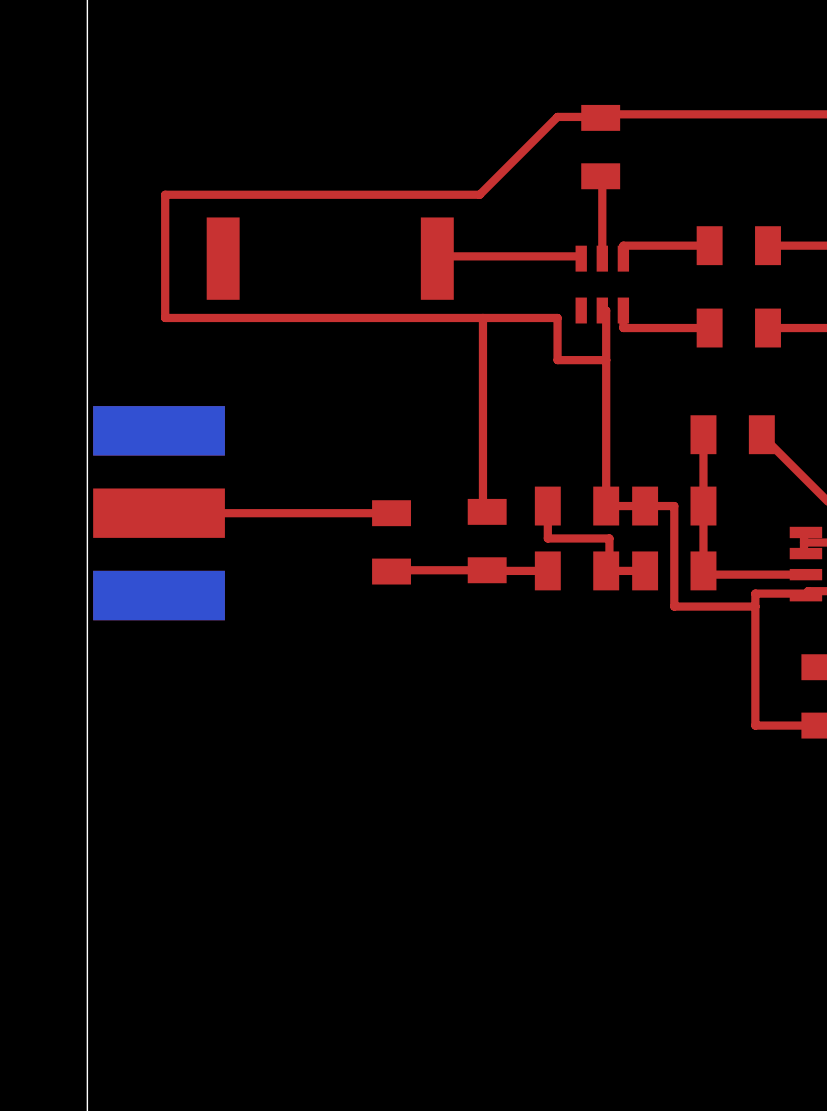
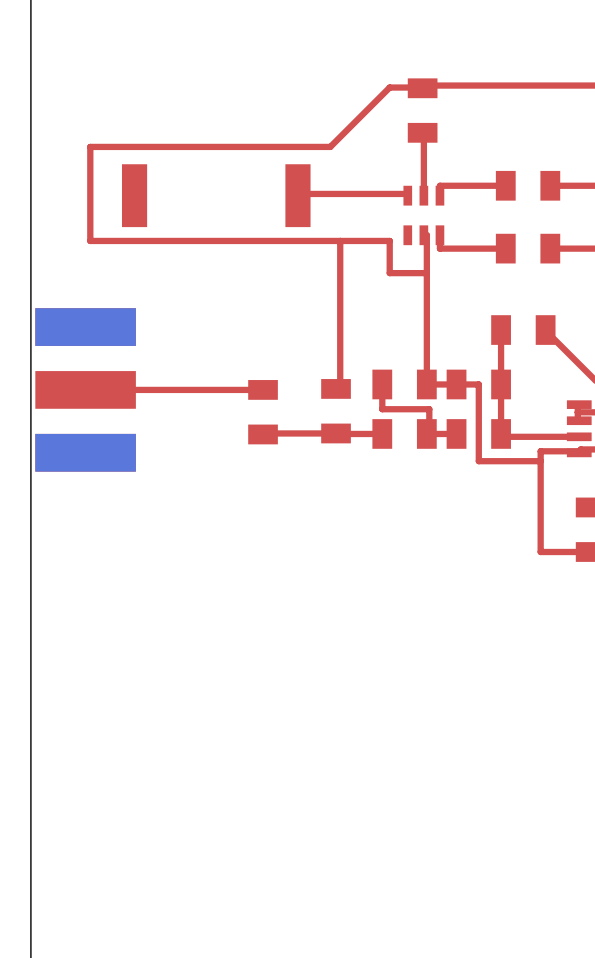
top track: (482, 317) (482, 511) (487, 511) -> none
top track: none -> (340, 240) (340, 388)

